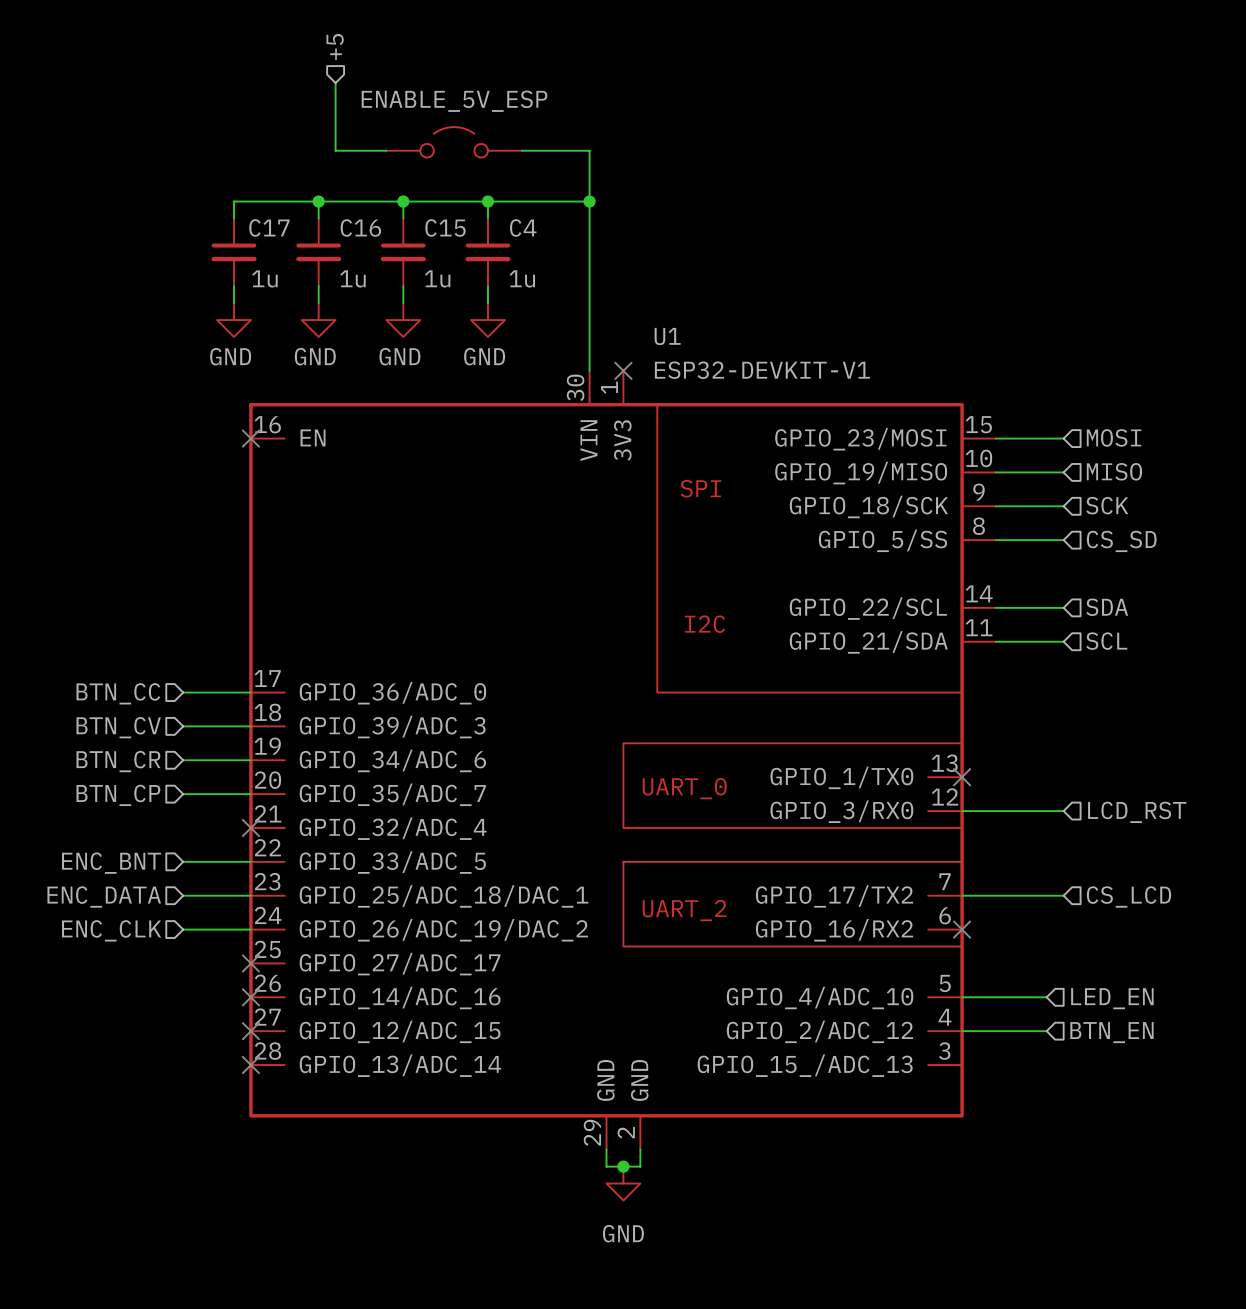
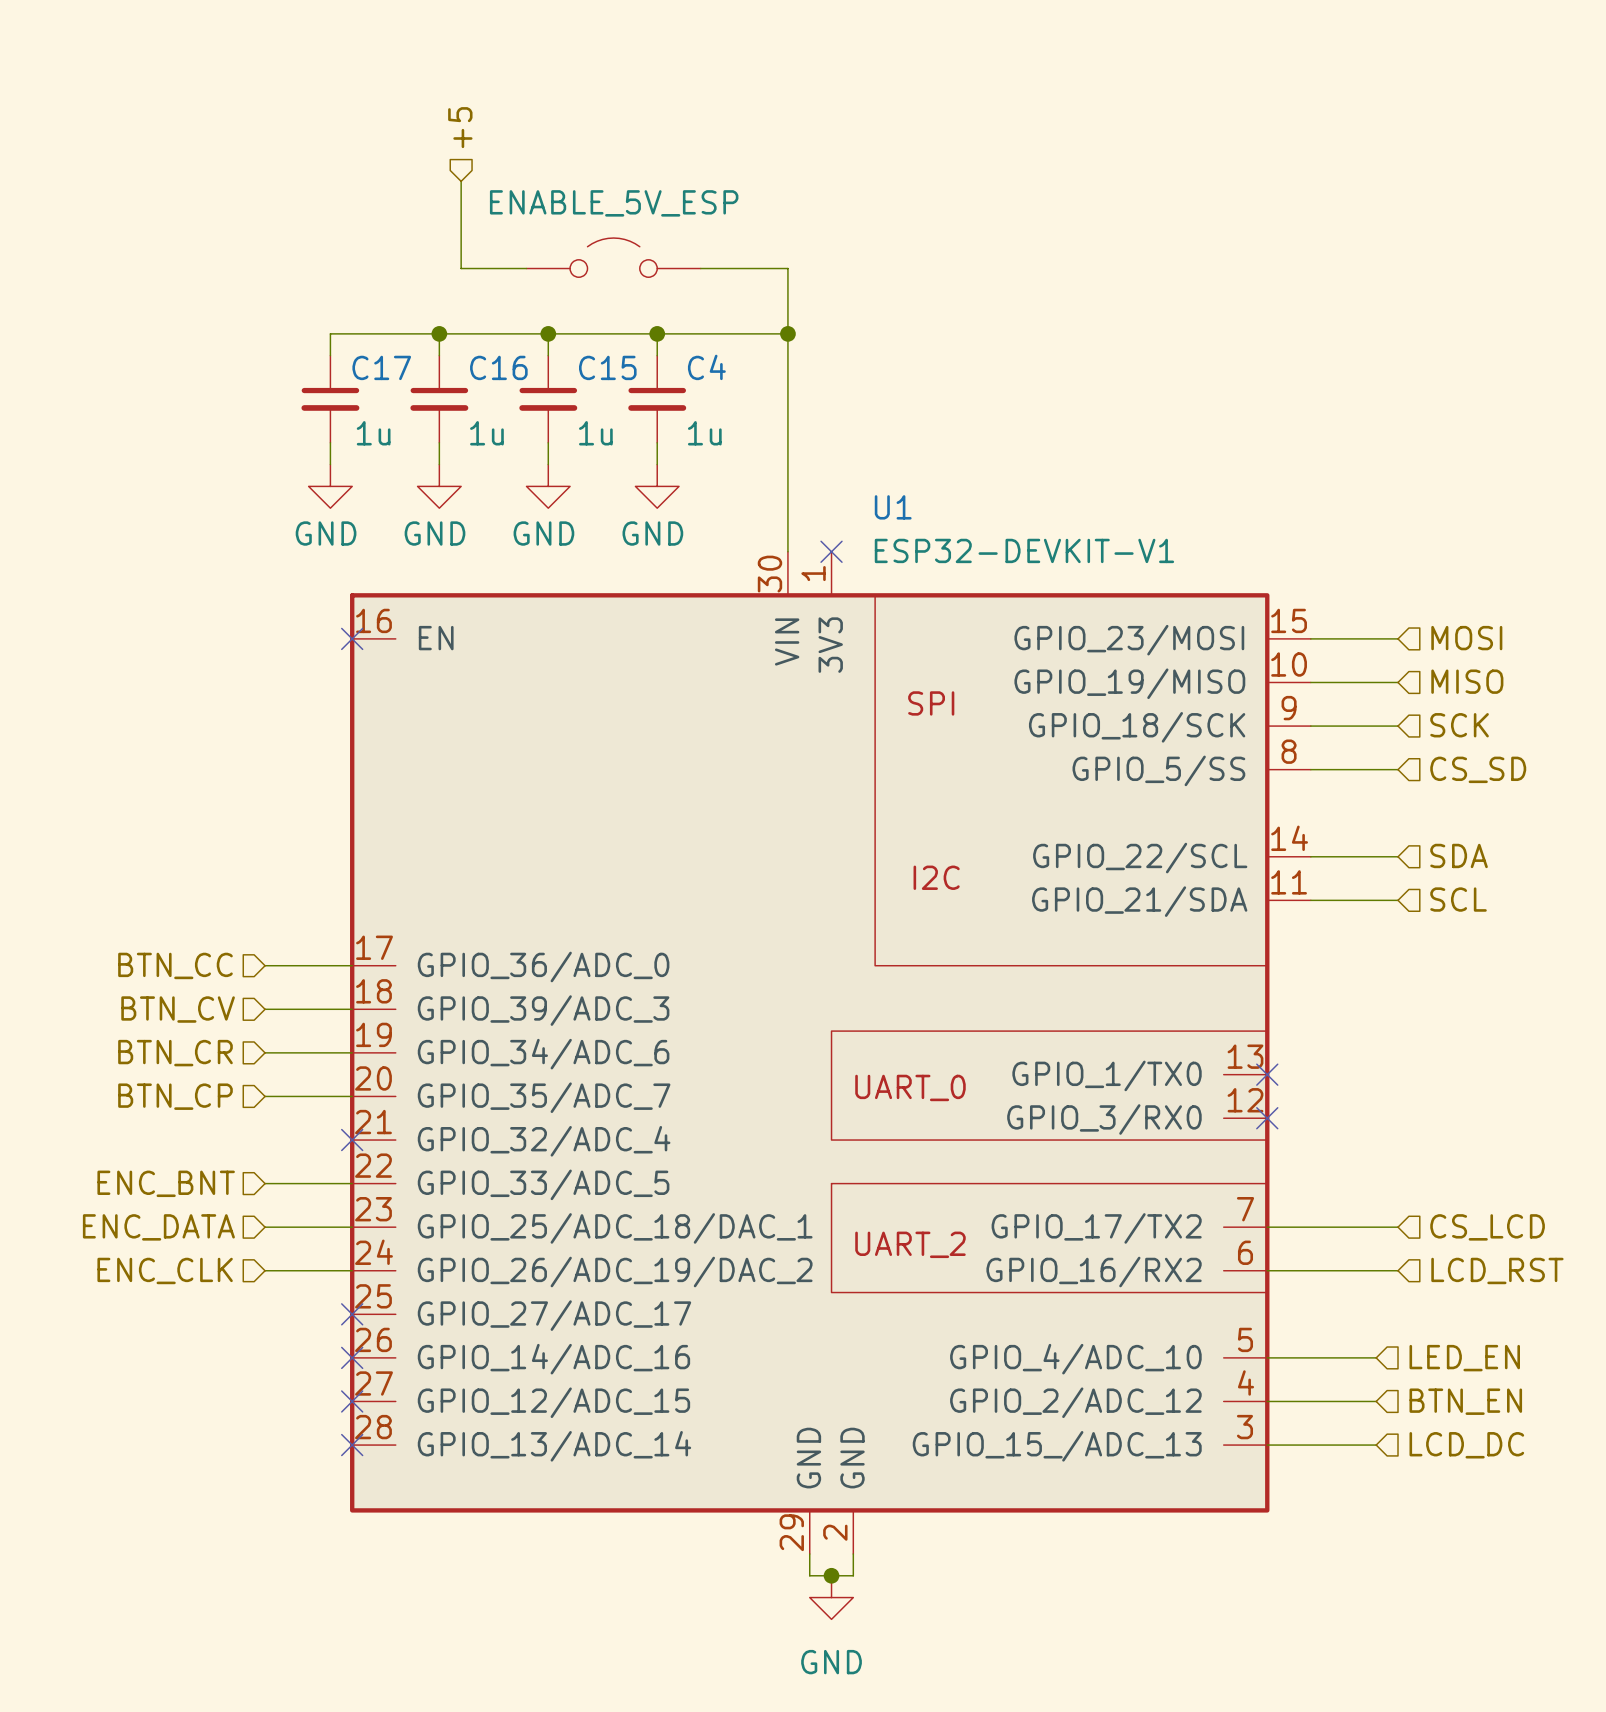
wire: (962, 811) (1063, 811) -> (1267, 1270) (1398, 1270)
no-connect mark: none -> (1267, 1118)
hierarchical label position: LCD_RST (1137, 812) -> LCD_RST (1497, 1270)
no-connect mark: (962, 929) -> none
wire: none -> (1267, 1445) (1376, 1445)
hierarchical label: none -> LCD_DC (1466, 1445)

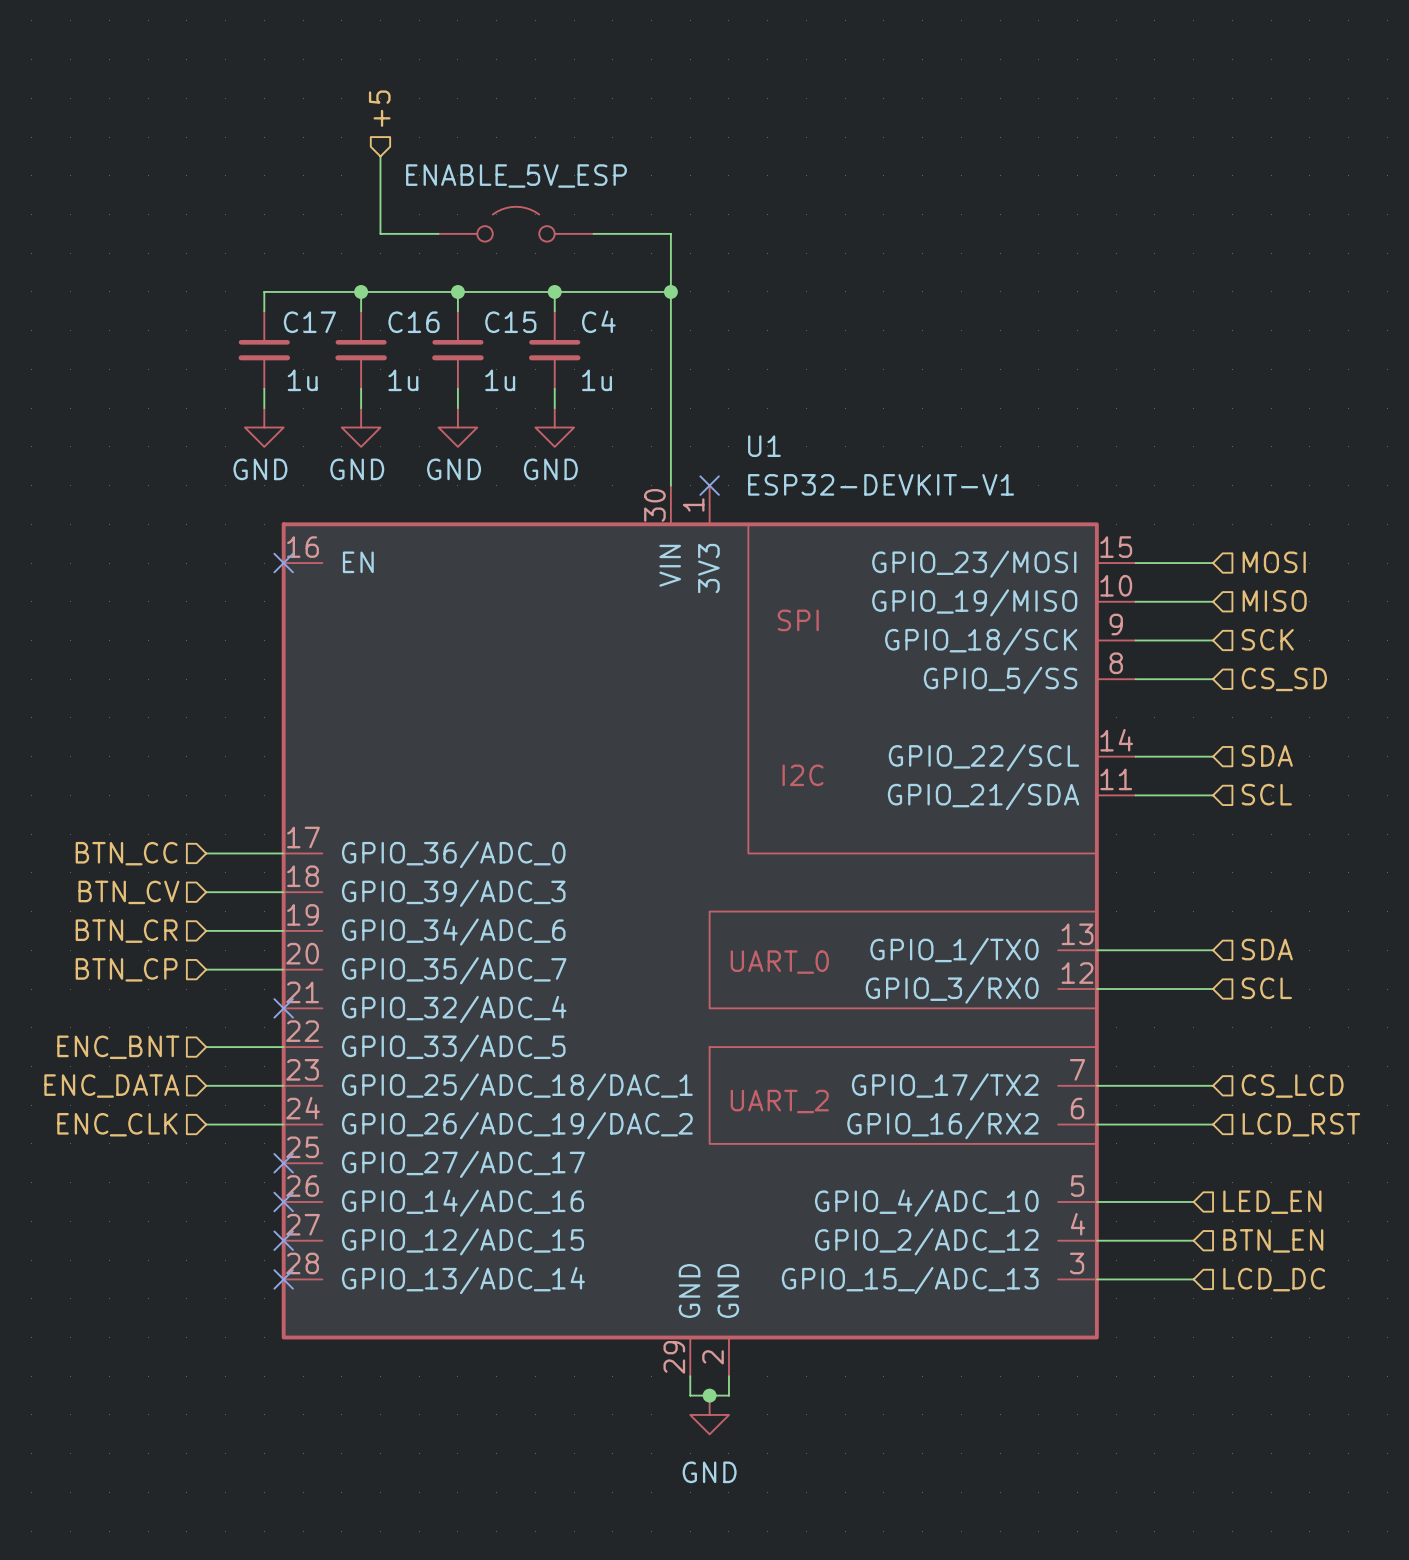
hierarchical label: none -> SDA (1267, 949)
wire: none -> (1096, 950) (1213, 950)
no-connect mark: (1267, 1074) -> none
hierarchical label: none -> SCL (1266, 988)
wire: none -> (1096, 989) (1213, 989)
no-connect mark: (1267, 1118) -> none

